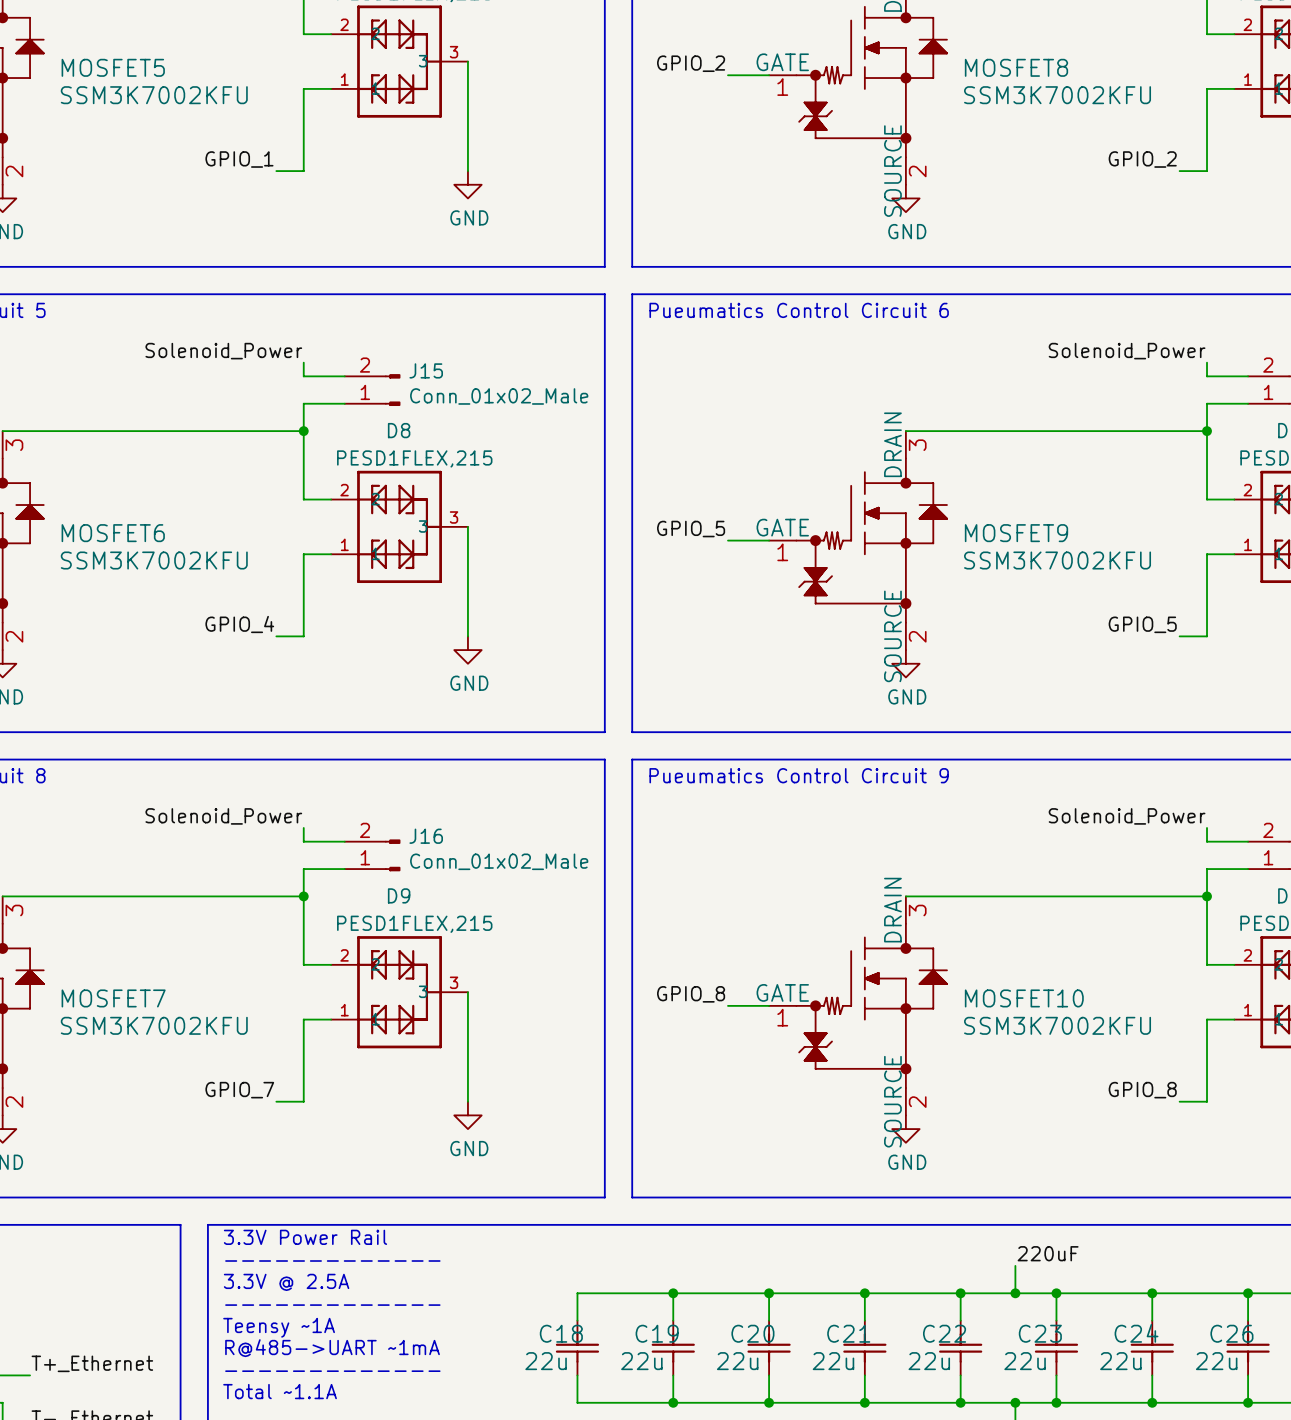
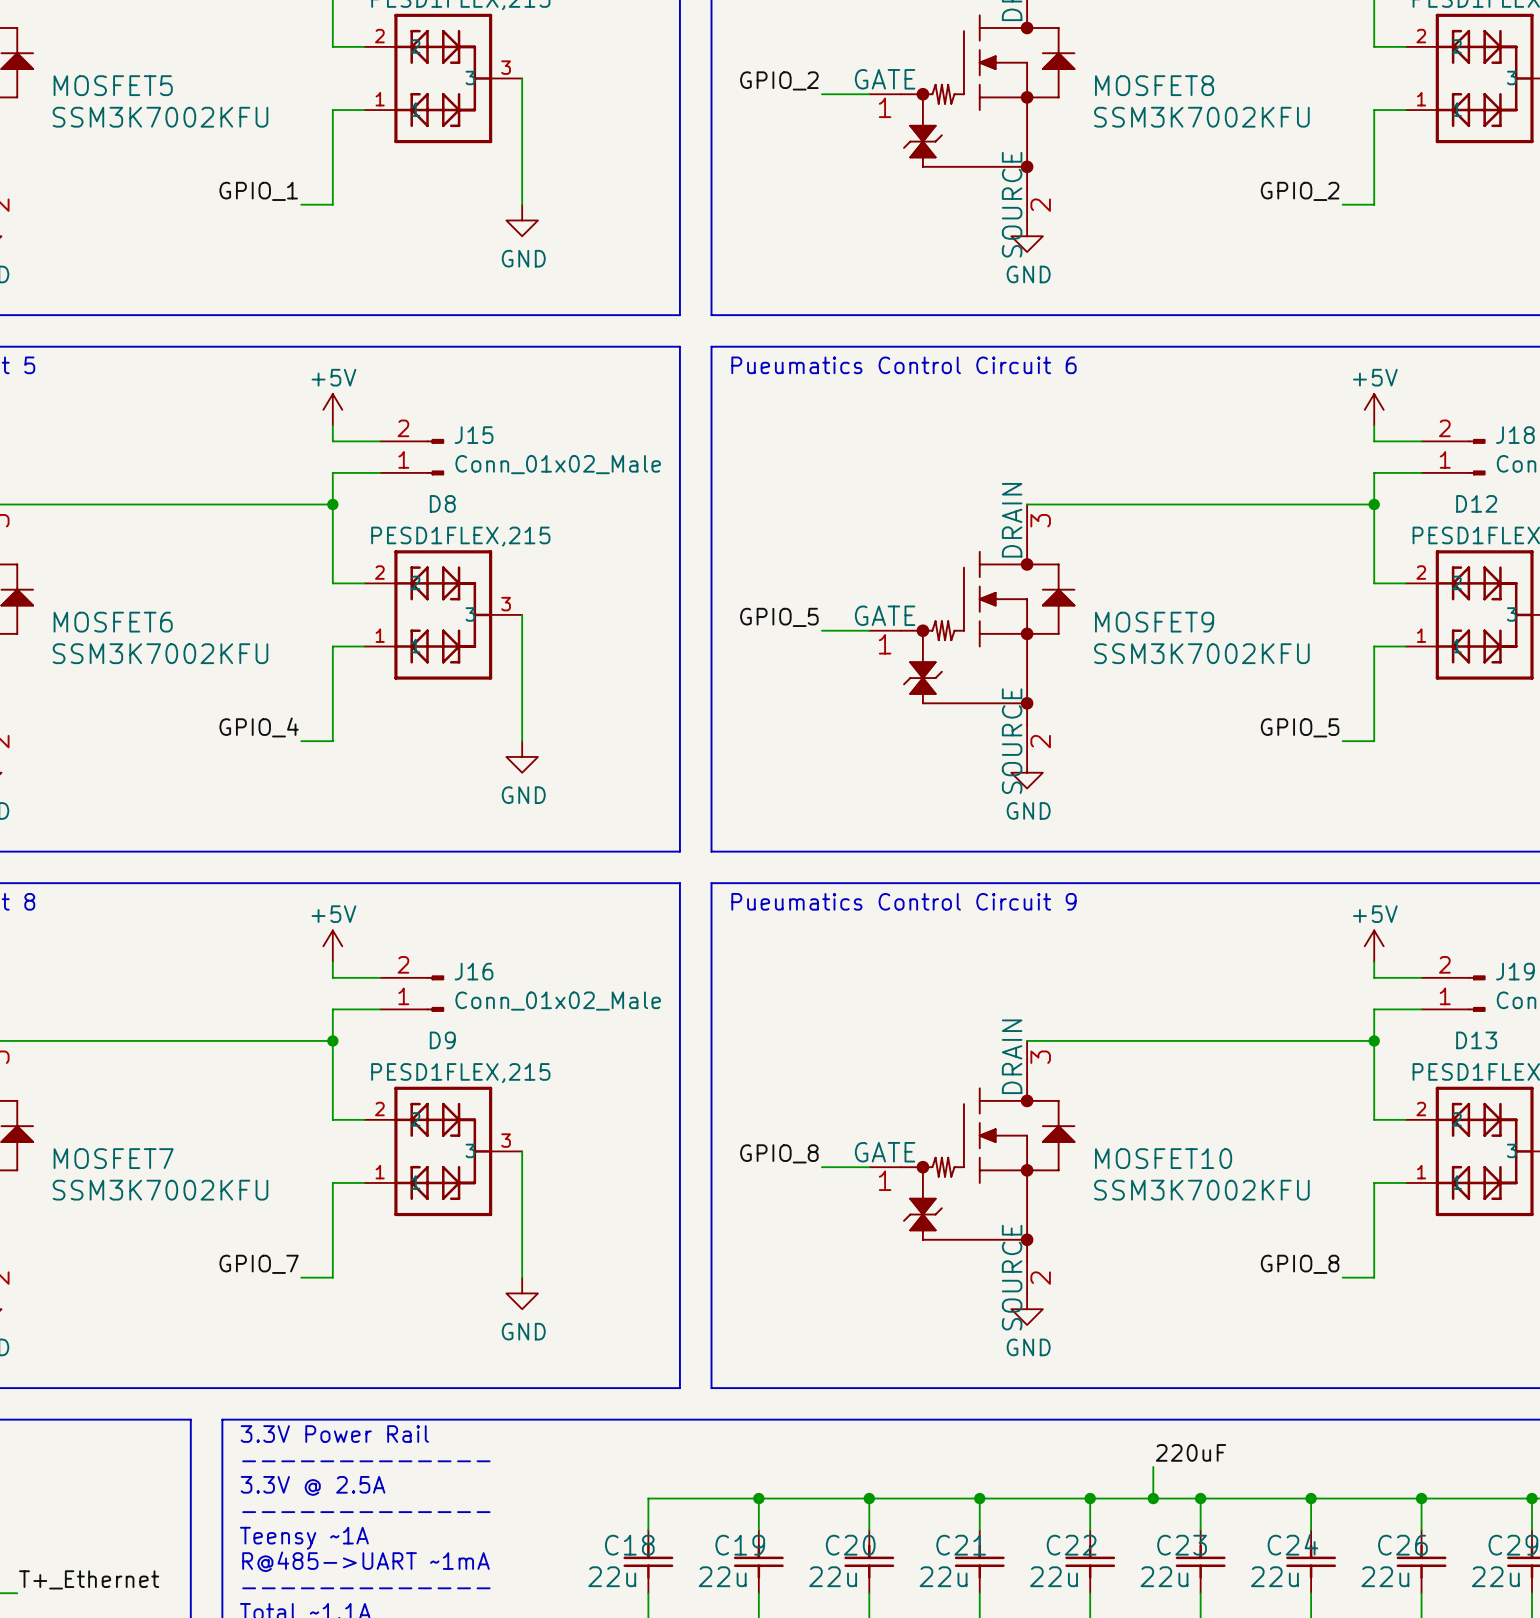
power symbol: none -> +5V (332, 409)
power symbol: none -> +5V (1374, 409)
label: Solenoid_Power (223, 351) -> none
label: Solenoid_Power (1127, 351) -> none
power symbol: none -> +5V (332, 946)
power symbol: none -> +5V (1374, 946)
label: Solenoid_Power (223, 816) -> none
label: Solenoid_Power (1127, 816) -> none

